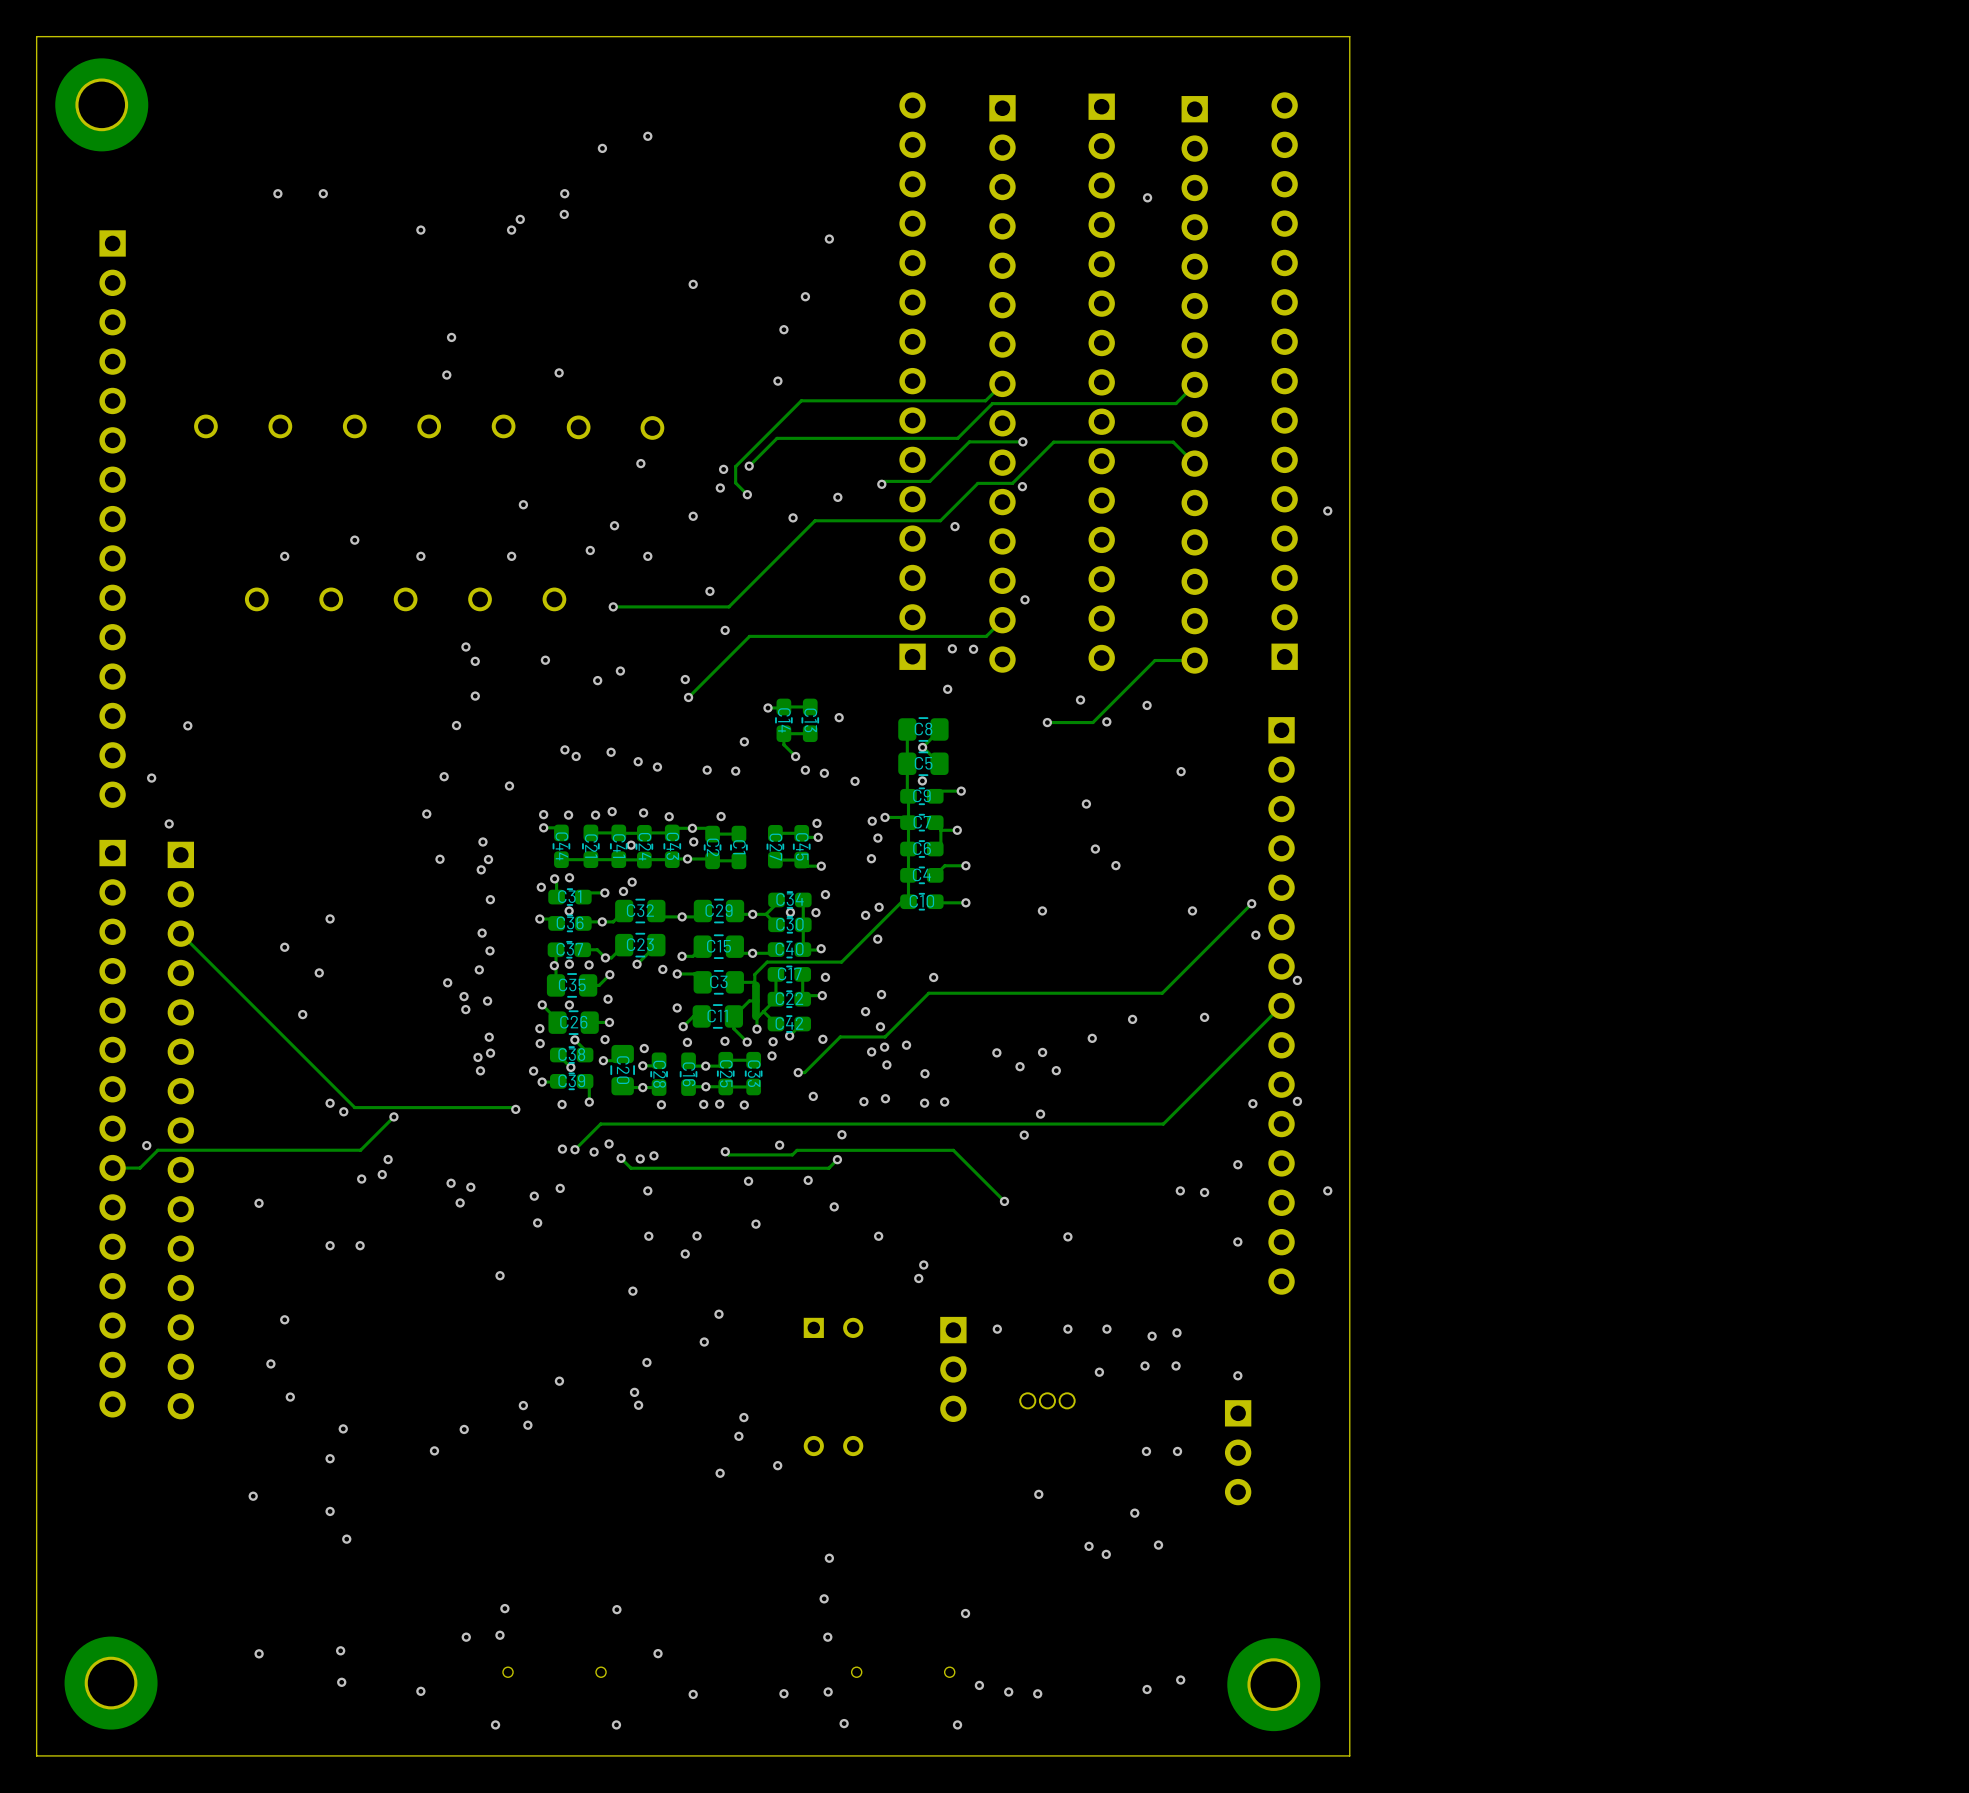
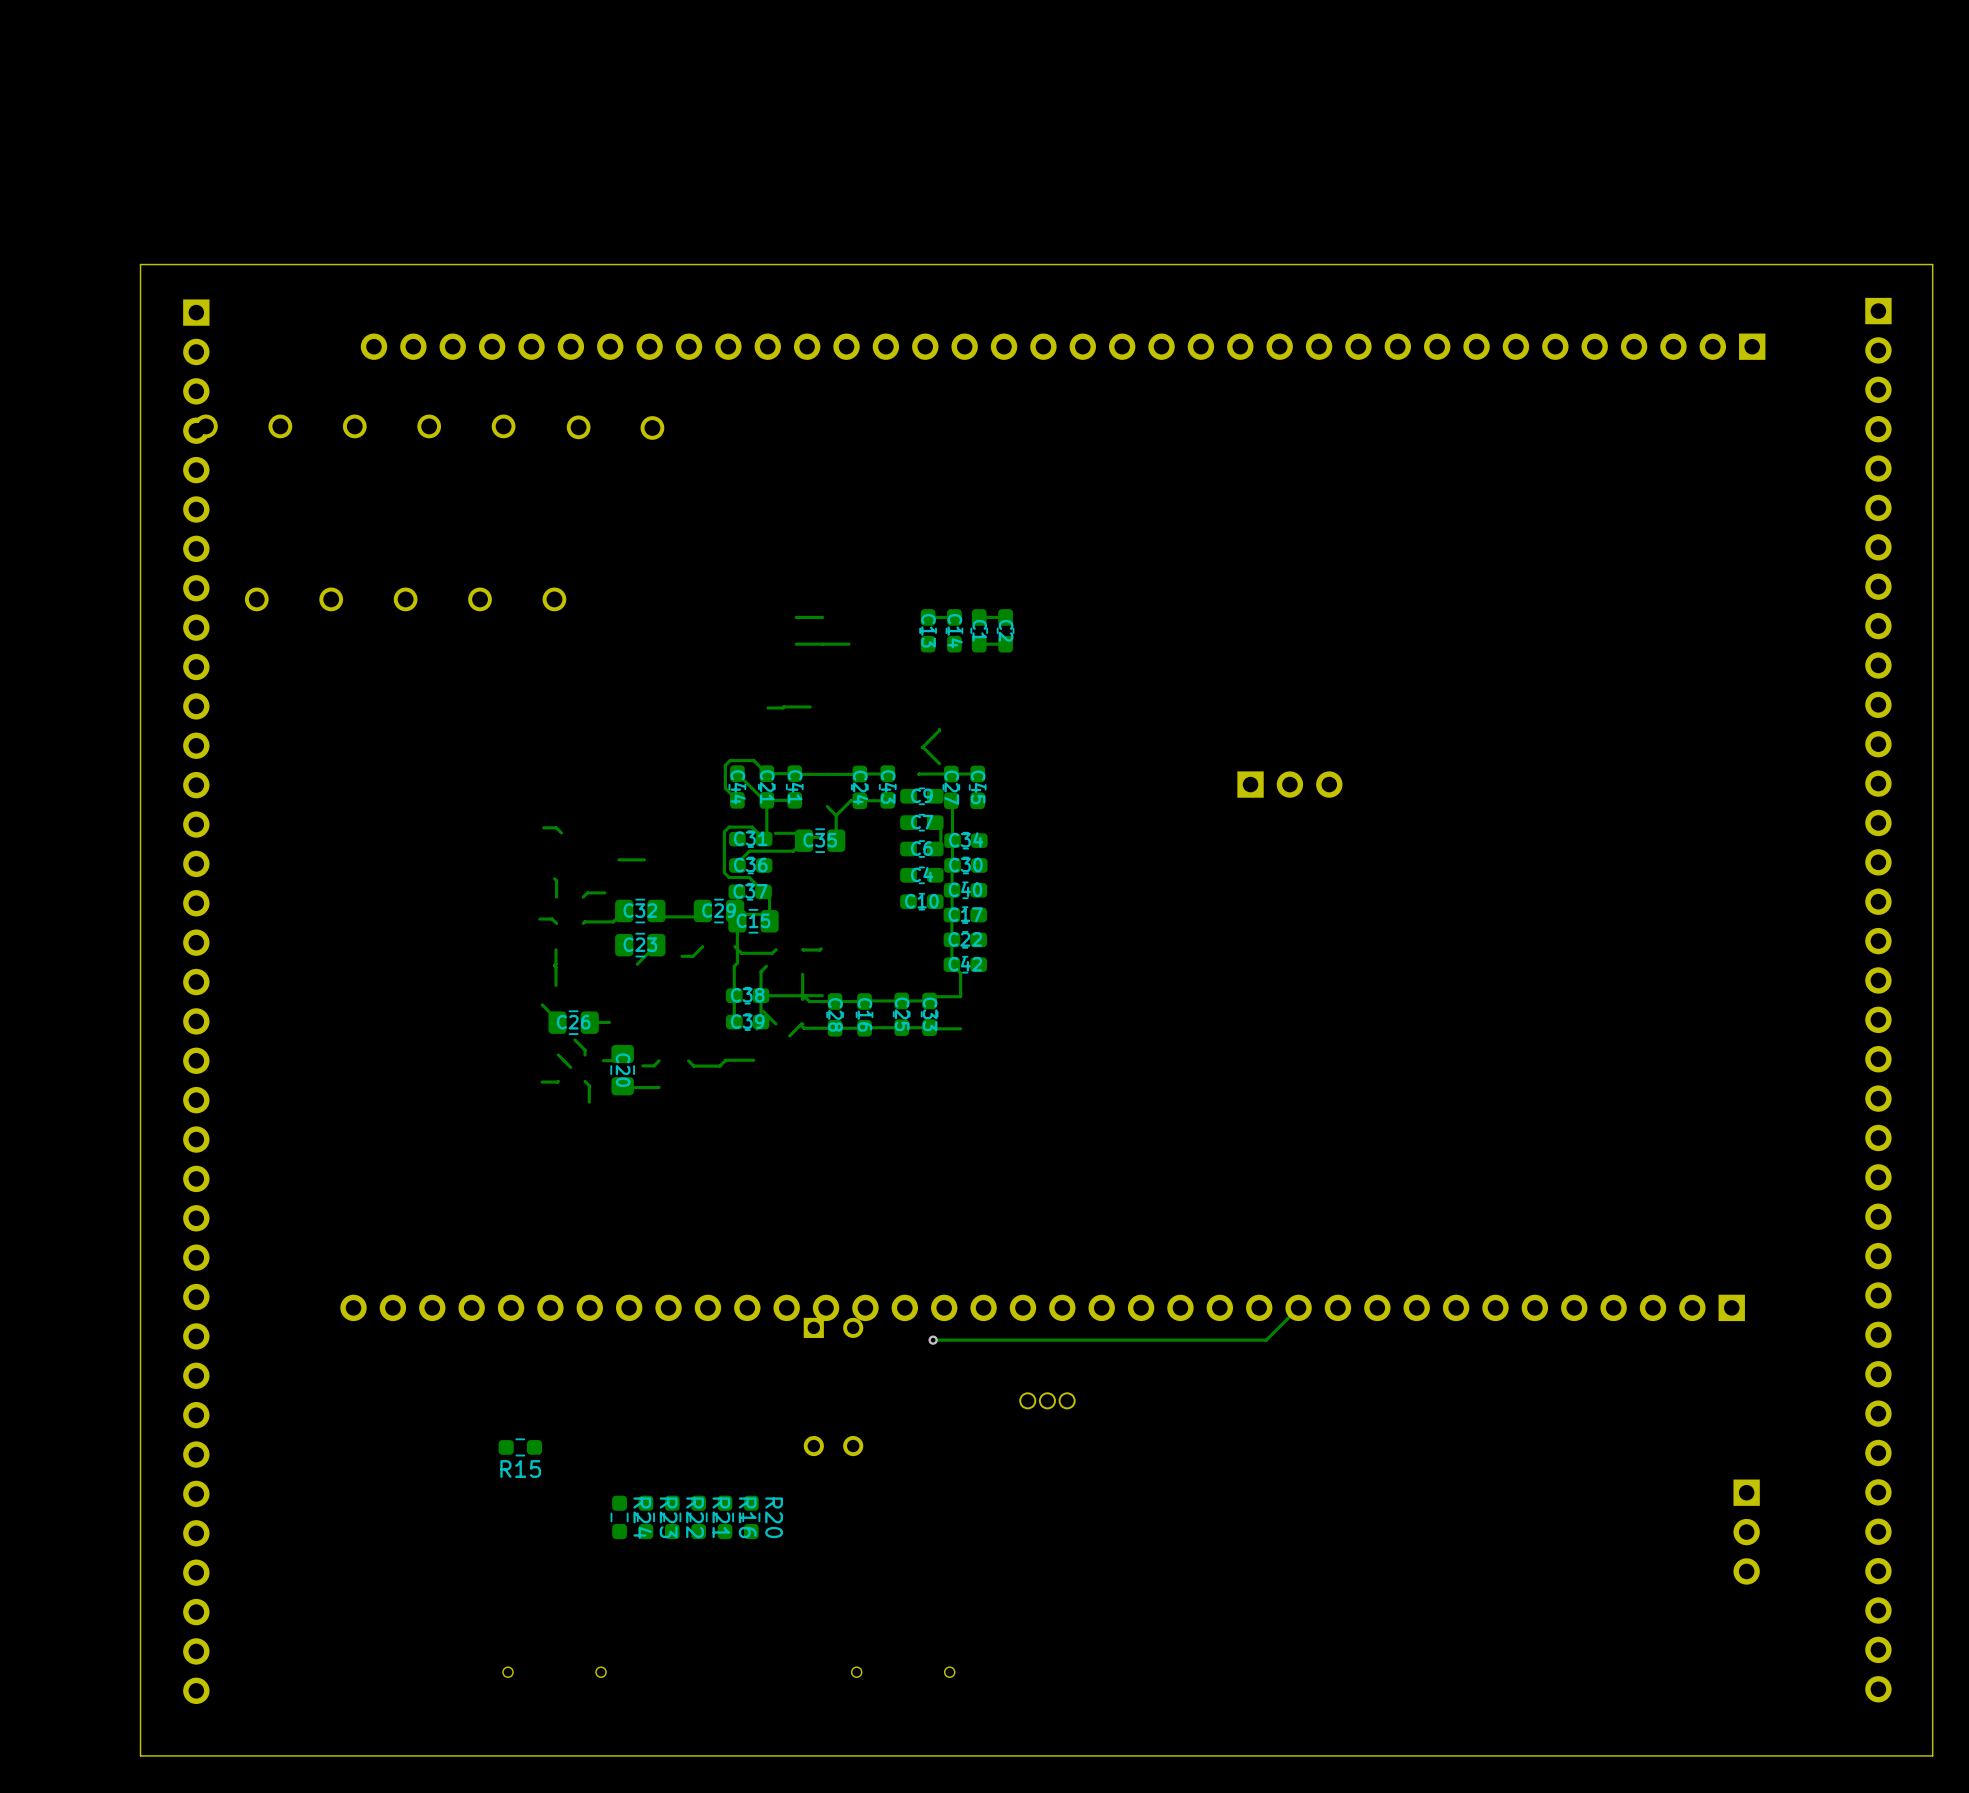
part: (101, 104) -> none
via: (647, 136) -> none
via: (602, 148) -> none
via: (277, 193) -> none
via: (323, 193) -> none
via: (564, 193) -> none
via: (1147, 197) -> none
via: (564, 214) -> none
via: (520, 219) -> none
via: (420, 230) -> none
via: (511, 230) -> none
via: (829, 239) -> none
via: (693, 284) -> none
via: (805, 296) -> none
via: (783, 329) -> none
via: (451, 337) -> none
part: none -> (1063, 346)
via: (559, 372) -> none
via: (446, 375) -> none
via: (777, 381) -> none
part: (912, 381) -> none
part: (1284, 381) -> none
part: (1101, 382) -> none
track: (1002, 383) (985, 400) (801, 400) (735, 466) (735, 482) (747, 494) -> none
part: (1002, 383) -> none
track: (1194, 384) (1175, 403) (992, 403) (957, 438) (777, 438) (749, 466) -> none
part: (1194, 384) -> none
track: (1022, 441) (969, 441) (929, 481) (884, 481) (881, 484) -> none
via: (1022, 441) -> none
via: (640, 463) -> none
track: (1194, 463) (1173, 442) (1053, 442) (1012, 483) (977, 483) (940, 520) (815, 520) (728, 606) (613, 606) -> none
via: (749, 466) -> none
via: (723, 469) -> none
via: (881, 484) -> none
via: (1022, 486) -> none
via: (720, 488) -> none
via: (747, 494) -> none
via: (837, 497) -> none
via: (523, 504) -> none
via: (1327, 511) -> none
via: (693, 516) -> none
via: (793, 517) -> none
part: (112, 519) -> none
via: (614, 525) -> none
via: (955, 526) -> none
via: (354, 540) -> none
via: (590, 550) -> none
via: (284, 556) -> none
via: (420, 556) -> none
via: (511, 556) -> none
via: (647, 556) -> none
via: (709, 591) -> none
via: (1024, 599) -> none
via: (613, 606) -> none
track: none -> (822, 617) (796, 617)
track: none -> (954, 617) (928, 617)
track: none -> (1005, 617) (979, 617)
track: (1002, 620) (986, 636) (749, 636) (688, 697) -> none
via: (725, 630) -> none
track: none -> (849, 644) (796, 644)
track: none -> (1005, 644) (979, 644)
via: (465, 646) -> none
via: (952, 648) -> none
via: (973, 649) -> none
via: (545, 660) -> none
track: (1194, 660) (1155, 660) (1092, 722) (1047, 722) -> none
via: (475, 661) -> none
via: (620, 671) -> none
via: (685, 679) -> none
via: (597, 680) -> none
via: (947, 689) -> none
via: (475, 696) -> none
via: (688, 697) -> none
via: (1080, 700) -> none
via: (1147, 705) -> none
via: (768, 707) -> none
via: (839, 717) -> none
C14 position: (783, 720) -> (954, 630)
C13 position: (810, 720) -> (928, 630)
via: (1106, 721) -> none
via: (1047, 722) -> none
via: (187, 725) -> none
via: (456, 725) -> none
track: (907, 729) (908, 901) (901, 901) (841, 962) (767, 962) (754, 974) (755, 985) -> none
C8: (923, 729) -> none
track: (810, 733) (783, 733) (783, 744) (795, 756) -> none
via: (744, 741) -> none
via: (922, 747) -> none
via: (564, 749) -> none
via: (611, 752) -> none
via: (576, 756) -> none
via: (795, 756) -> none
via: (638, 761) -> none
C5: (923, 763) -> none
via: (657, 767) -> none
via: (707, 770) -> none
via: (805, 770) -> none
via: (735, 771) -> none
via: (1181, 771) -> none
track: none -> (737, 773) (764, 800) (794, 800)
via: (824, 773) -> none
track: none -> (887, 773) (766, 773) (753, 760) (730, 760) (725, 765) (725, 788) (737, 800)
track: none -> (977, 774) (918, 774)
via: (444, 776) -> none
via: (151, 778) -> none
via: (922, 780) -> none
via: (855, 781) -> none
part: none -> (1289, 784)
via: (509, 786) -> none
track: (961, 791) (940, 791) (935, 796) -> none
via: (961, 791) -> none
track: none -> (766, 800) (766, 836) (764, 839) (752, 827) (729, 827) (724, 831) (724, 872) (729, 877) (749, 877) (769, 897) (769, 921)
track: none -> (887, 800) (850, 800) (836, 815)
track: none -> (952, 801) (952, 914)
via: (1086, 804) -> none
track: none -> (827, 806) (836, 815)
via: (612, 811) -> none
via: (643, 812) -> none
via: (426, 814) -> none
via: (543, 814) -> none
via: (568, 815) -> none
via: (595, 815) -> none
track: none -> (836, 815) (836, 840)
via: (669, 816) -> none
via: (721, 816) -> none
track: (885, 817) (903, 817) (908, 822) -> none
via: (885, 817) -> none
via: (872, 821) -> none
via: (169, 823) -> none
via: (816, 823) -> none
via: (543, 827) -> none
via: (692, 828) -> none
track: (957, 830) (940, 830) -> none
via: (957, 830) -> none
track: (590, 832) (672, 832) (676, 828) (706, 828) (712, 834) (738, 834) -> none
via: (818, 837) -> none
via: (877, 838) -> none
track: none -> (804, 840) (793, 851) (749, 851) (737, 865)
via: (482, 841) -> none
via: (693, 841) -> none
via: (631, 845) -> none
C44 position: (561, 846) -> (737, 786)
C21 position: (590, 846) -> (766, 786)
C41 position: (618, 846) -> (794, 786)
C24 position: (644, 846) -> (859, 787)
C43 position: (672, 846) -> (887, 786)
C27 position: (775, 846) -> (951, 787)
C45 position: (801, 846) -> (977, 787)
C2 position: (712, 847) -> (1005, 630)
C1 position: (738, 847) -> (979, 630)
via: (1095, 849) -> none
via: (687, 858) -> none
via: (871, 858) -> none
via: (440, 859) -> none
via: (488, 859) -> none
track: (618, 859) (561, 859) -> none
track: (644, 859) (738, 860) -> none
track: (775, 860) (801, 860) (807, 866) (821, 866) -> none
track: (965, 865) (944, 865) (935, 875) -> none
via: (965, 865) -> none
via: (1115, 865) -> none
via: (821, 866) -> none
via: (481, 869) -> none
via: (569, 877) -> none
via: (554, 878) -> none
via: (632, 882) -> none
via: (541, 887) -> none
via: (623, 891) -> none
track: none -> (736, 891) (737, 963) (734, 966) (734, 1022)
via: (604, 892) -> none
via: (825, 894) -> none
C31 position: (569, 897) -> (750, 839)
via: (490, 899) -> none
track: (776, 899) (776, 903) (766, 914) -> none
C34 position: (789, 899) -> (965, 840)
track: (803, 899) (803, 949) -> none
track: (935, 901) (965, 902) -> none
via: (965, 902) -> none
track: (1251, 903) (1162, 993) (928, 993) (885, 1036) (840, 1036) (804, 1072) (798, 1072) -> none
via: (1251, 903) -> none
via: (879, 907) -> none
via: (1042, 910) -> none
via: (1192, 910) -> none
via: (569, 911) -> none
via: (790, 912) -> none
via: (815, 912) -> none
via: (752, 914) -> none
via: (865, 915) -> none
track: none -> (951, 915) (951, 964) (960, 973) (960, 996) (933, 996) (929, 1000) (809, 1001) (802, 994) (761, 995)
via: (682, 916) -> none
via: (330, 918) -> none
via: (539, 919) -> none
via: (602, 921) -> none
C36 position: (569, 923) -> (750, 865)
C30 position: (789, 924) -> (965, 865)
track: (180, 933) (354, 1107) (513, 1107) (515, 1109) -> none
via: (482, 933) -> none
via: (1255, 935) -> none
via: (877, 939) -> none
track: (624, 945) (611, 957) (605, 957) (597, 949) (582, 949) -> none
C15 position: (718, 946) -> (753, 921)
via: (284, 947) -> none
via: (821, 948) -> none
C37 position: (569, 949) -> (750, 891)
C40 position: (789, 949) -> (965, 890)
via: (490, 950) -> none
via: (752, 953) -> none
via: (682, 956) -> none
via: (605, 957) -> none
via: (569, 964) -> none
via: (637, 964) -> none
via: (554, 965) -> none
via: (589, 965) -> none
track: none -> (766, 966) (761, 971) (761, 1022)
via: (479, 969) -> none
via: (662, 969) -> none
via: (319, 972) -> none
track: (677, 973) (694, 973) (702, 982) -> none
via: (677, 973) -> none
track: (609, 974) (599, 985) (588, 985) -> none
via: (609, 974) -> none
track: (775, 974) (775, 999) (758, 1016) (755, 1016) -> none
C17 position: (789, 974) -> (965, 915)
via: (825, 977) -> none
via: (933, 977) -> none
via: (1297, 980) -> none
via: (447, 982) -> none
C3: (718, 982) -> none
track: (754, 982) (734, 982) -> none
C35 position: (572, 985) -> (820, 840)
via: (881, 994) -> none
via: (822, 995) -> none
via: (464, 996) -> none
via: (608, 999) -> none
C22 position: (789, 999) -> (965, 939)
track: (755, 1000) (749, 1000) (733, 1016) (733, 1028) (747, 1042) -> none
part: (755, 1000) -> none
part: none -> (1878, 1000)
part: none -> (196, 1001)
via: (487, 1001) -> none
via: (542, 1004) -> none
via: (569, 1005) -> none
track: (1281, 1005) (1163, 1124) (600, 1124) (574, 1149) -> none
part: (1281, 1005) -> none
via: (677, 1007) -> none
via: (465, 1009) -> none
via: (865, 1011) -> none
via: (302, 1014) -> none
track: (701, 1016) (693, 1016) (683, 1026) -> none
C11: (717, 1016) -> none
via: (1204, 1017) -> none
via: (1132, 1019) -> none
via: (609, 1022) -> none
C42 position: (789, 1024) -> (965, 964)
via: (683, 1026) -> none
track: none -> (802, 1026) (804, 1028) (960, 1028)
via: (880, 1026) -> none
via: (539, 1028) -> none
via: (756, 1029) -> none
via: (789, 1035) -> none
via: (489, 1037) -> none
via: (1092, 1038) -> none
via: (574, 1039) -> none
via: (605, 1039) -> none
via: (822, 1039) -> none
via: (724, 1041) -> none
via: (773, 1041) -> none
via: (687, 1042) -> none
via: (747, 1042) -> none
via: (540, 1043) -> none
via: (906, 1045) -> none
via: (884, 1047) -> none
via: (644, 1048) -> none
via: (871, 1051) -> none
via: (996, 1052) -> none
via: (1042, 1052) -> none
via: (490, 1053) -> none
C38 position: (571, 1055) -> (747, 995)
via: (772, 1055) -> none
via: (477, 1057) -> none
via: (603, 1060) -> none
via: (886, 1064) -> none
via: (642, 1065) -> none
via: (705, 1066) -> none
via: (1020, 1066) -> none
via: (570, 1067) -> none
via: (480, 1070) -> none
via: (1056, 1070) -> none
via: (533, 1071) -> none
via: (798, 1072) -> none
C25 position: (725, 1073) -> (901, 1014)
C33 position: (753, 1073) -> (929, 1014)
via: (924, 1073) -> none
C28 position: (659, 1074) -> (835, 1014)
C16 position: (688, 1074) -> (864, 1014)
C39 position: (571, 1081) -> (747, 1022)
via: (542, 1082) -> none
via: (705, 1086) -> none
track: (753, 1086) (688, 1087) -> none
via: (642, 1087) -> none
via: (813, 1096) -> none
via: (885, 1098) -> none
via: (863, 1101) -> none
via: (944, 1101) -> none
via: (1297, 1101) -> none
via: (589, 1102) -> none
via: (330, 1103) -> none
via: (924, 1103) -> none
via: (1252, 1103) -> none
via: (562, 1104) -> none
via: (661, 1104) -> none
via: (703, 1104) -> none
via: (719, 1104) -> none
via: (744, 1105) -> none
via: (515, 1109) -> none
via: (343, 1111) -> none
via: (1040, 1114) -> none
track: (393, 1116) (360, 1150) (157, 1150) (140, 1168) (112, 1168) -> none
via: (393, 1116) -> none
part: (112, 1128) -> none
part: (180, 1130) -> none
via: (841, 1134) -> none
via: (1024, 1135) -> none
via: (609, 1143) -> none
via: (146, 1145) -> none
via: (779, 1145) -> none
via: (562, 1149) -> none
via: (574, 1149) -> none
track: (725, 1151) (728, 1154) (792, 1154) (797, 1150) (953, 1150) (1004, 1201) -> none
via: (725, 1151) -> none
via: (594, 1152) -> none
via: (653, 1155) -> none
track: (621, 1158) (631, 1168) (828, 1168) (837, 1159) -> none
via: (621, 1158) -> none
via: (640, 1158) -> none
via: (388, 1159) -> none
via: (837, 1159) -> none
via: (1237, 1164) -> none
via: (382, 1174) -> none
via: (361, 1179) -> none
via: (808, 1180) -> none
via: (748, 1181) -> none
via: (451, 1183) -> none
via: (470, 1187) -> none
via: (560, 1188) -> none
via: (647, 1190) -> none
via: (1180, 1190) -> none
via: (1327, 1190) -> none
via: (1204, 1192) -> none
via: (534, 1196) -> none
via: (1004, 1201) -> none
via: (460, 1202) -> none
via: (259, 1203) -> none
via: (834, 1206) -> none
via: (537, 1222) -> none
via: (755, 1224) -> none
via: (648, 1236) -> none
via: (697, 1236) -> none
via: (878, 1236) -> none
via: (1067, 1236) -> none
via: (1237, 1241) -> none
via: (330, 1245) -> none
via: (360, 1245) -> none
via: (685, 1253) -> none
via: (923, 1265) -> none
via: (500, 1275) -> none
via: (918, 1278) -> none
via: (632, 1291) -> none
part: none -> (1042, 1307)
track: none -> (1298, 1307) (1266, 1340) (933, 1340)
via: (718, 1314) -> none
via: (284, 1319) -> none
via: (997, 1329) -> none
via: (1067, 1329) -> none
via: (1106, 1329) -> none
via: (1176, 1332) -> none
via: (1152, 1336) -> none
via: none -> (933, 1340)
via: (704, 1342) -> none
via: (646, 1362) -> none
via: (270, 1363) -> none
via: (1145, 1365) -> none
via: (1176, 1365) -> none
part: (953, 1369) -> none
via: (1099, 1372) -> none
via: (1237, 1375) -> none
via: (559, 1381) -> none
via: (634, 1392) -> none
via: (290, 1397) -> none
via: (523, 1405) -> none
via: (638, 1405) -> none
via: (743, 1417) -> none
via: (527, 1425) -> none
via: (343, 1428) -> none
via: (464, 1429) -> none
via: (738, 1436) -> none
R15: none -> (520, 1447)
via: (434, 1450) -> none
via: (1146, 1451) -> none
via: (1177, 1451) -> none
part: (1238, 1452) -> none
via: (330, 1458) -> none
via: (777, 1465) -> none
via: (720, 1473) -> none
via: (1038, 1494) -> none
via: (253, 1496) -> none
via: (330, 1511) -> none
via: (1134, 1513) -> none
R24: none -> (619, 1517)
R23: none -> (645, 1517)
R22: none -> (672, 1517)
R21: none -> (698, 1517)
R16: none -> (724, 1517)
R20: none -> (751, 1517)
part: none -> (1746, 1532)
via: (346, 1539) -> none
via: (1158, 1545) -> none
via: (1089, 1546) -> none
via: (1106, 1554) -> none
via: (829, 1558) -> none
via: (824, 1598) -> none
via: (504, 1608) -> none
via: (616, 1609) -> none
via: (965, 1613) -> none
via: (499, 1635) -> none
via: (466, 1637) -> none
via: (827, 1637) -> none
via: (340, 1650) -> none
via: (259, 1653) -> none
via: (658, 1653) -> none
via: (1180, 1680) -> none
via: (341, 1682) -> none
part: (111, 1683) -> none
part: (1273, 1684) -> none
via: (979, 1685) -> none
via: (1147, 1689) -> none
via: (420, 1691) -> none
via: (828, 1691) -> none
via: (1008, 1691) -> none
via: (783, 1693) -> none
via: (1037, 1693) -> none
via: (693, 1694) -> none
via: (844, 1723) -> none
via: (495, 1724) -> none
via: (616, 1724) -> none
via: (957, 1724) -> none
board edge: (1349, 1755) (1349, 36) (36, 36) (36, 1755) (140, 1755) -> (1349, 1755) (1932, 1755) (1932, 264) (140, 264) (140, 1755)

